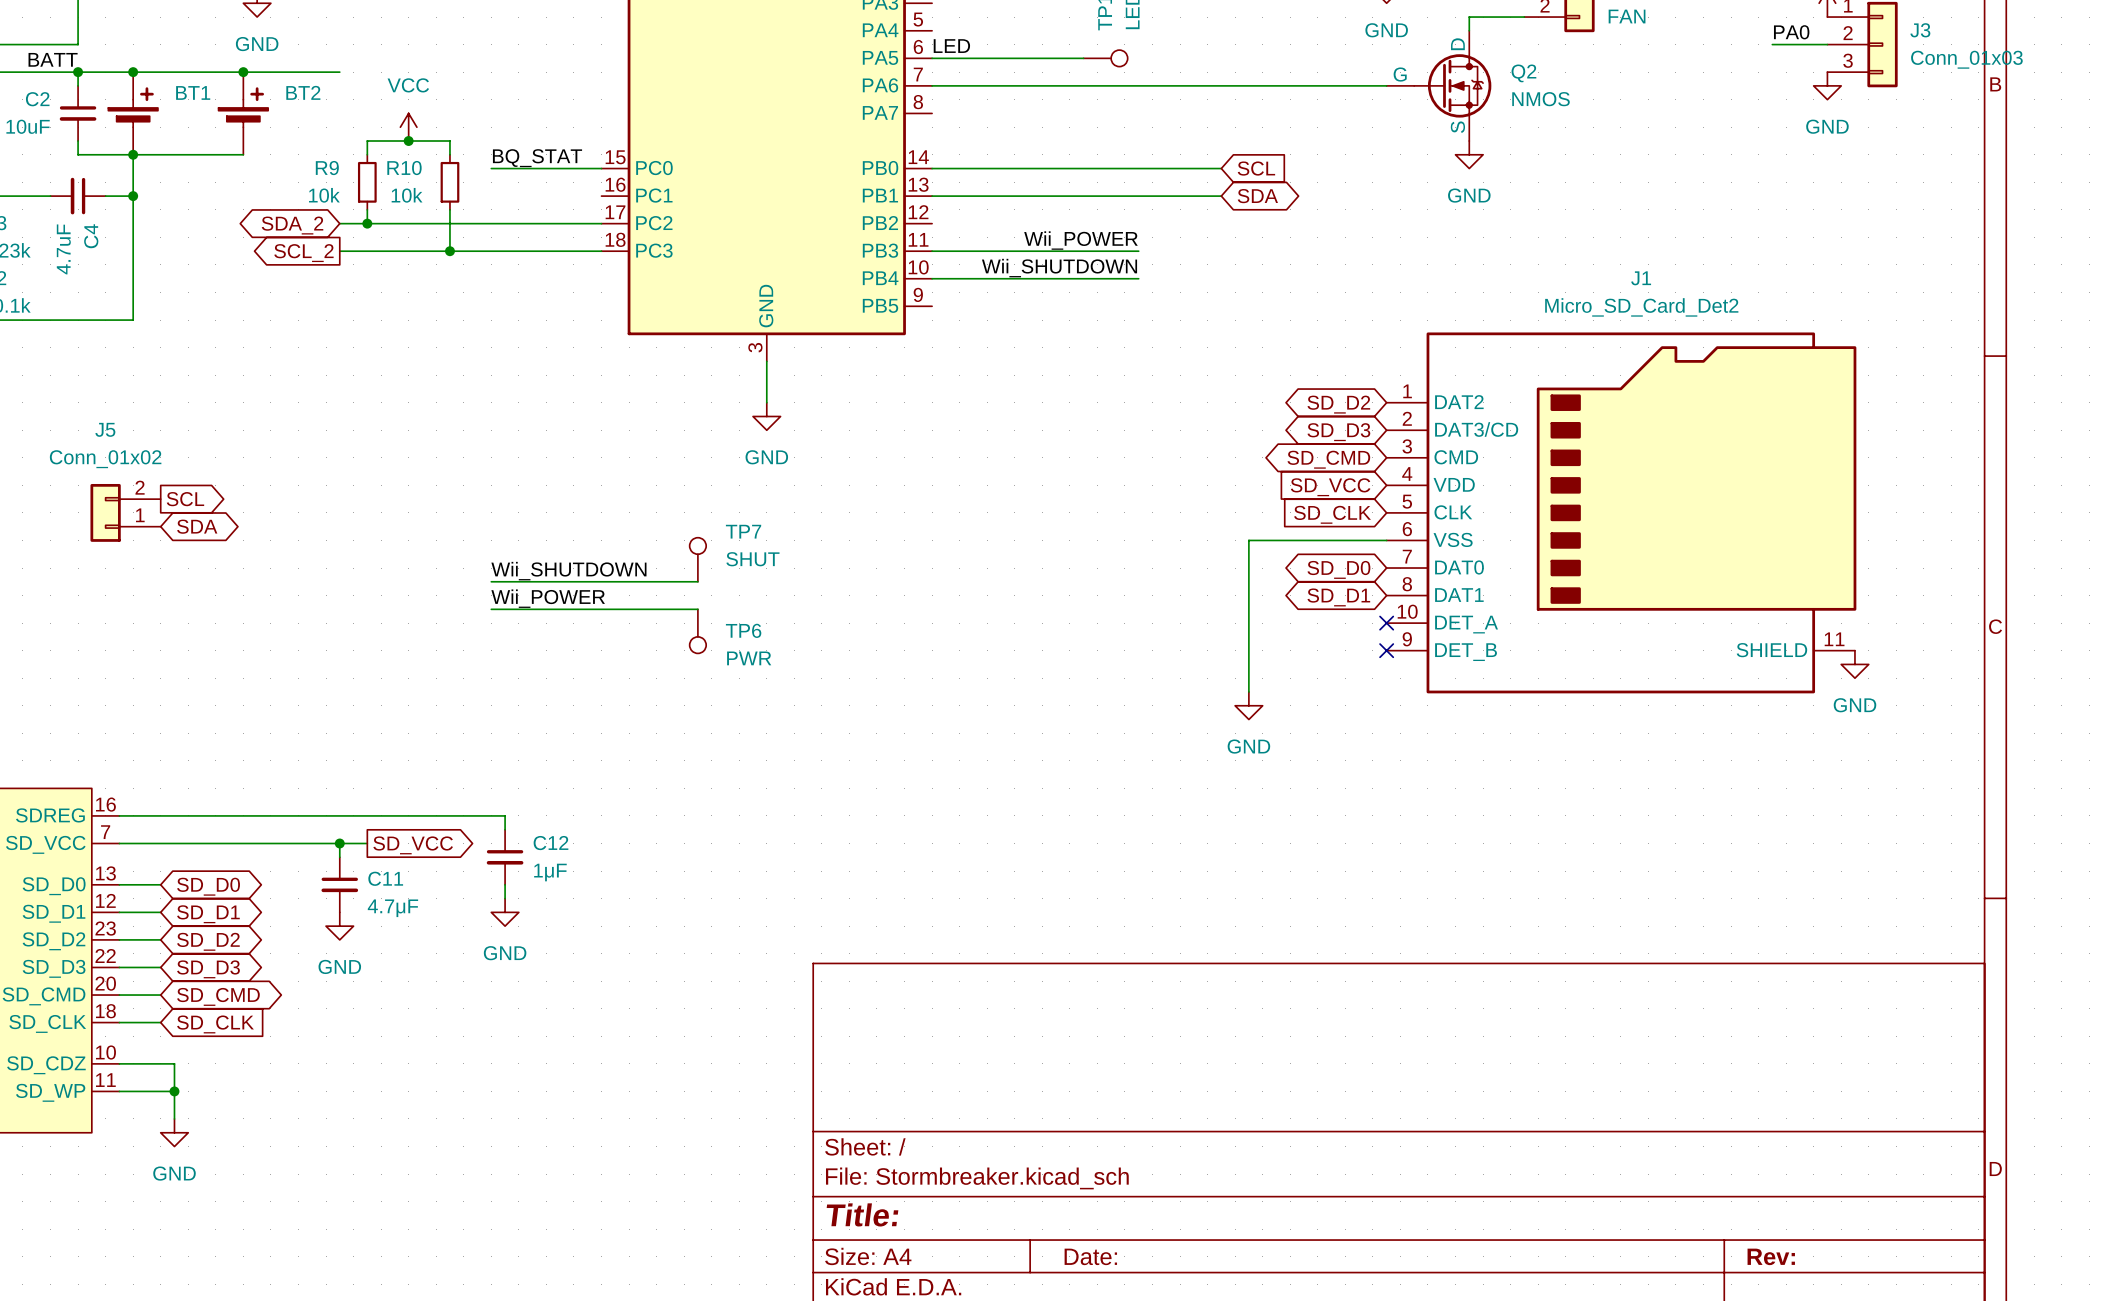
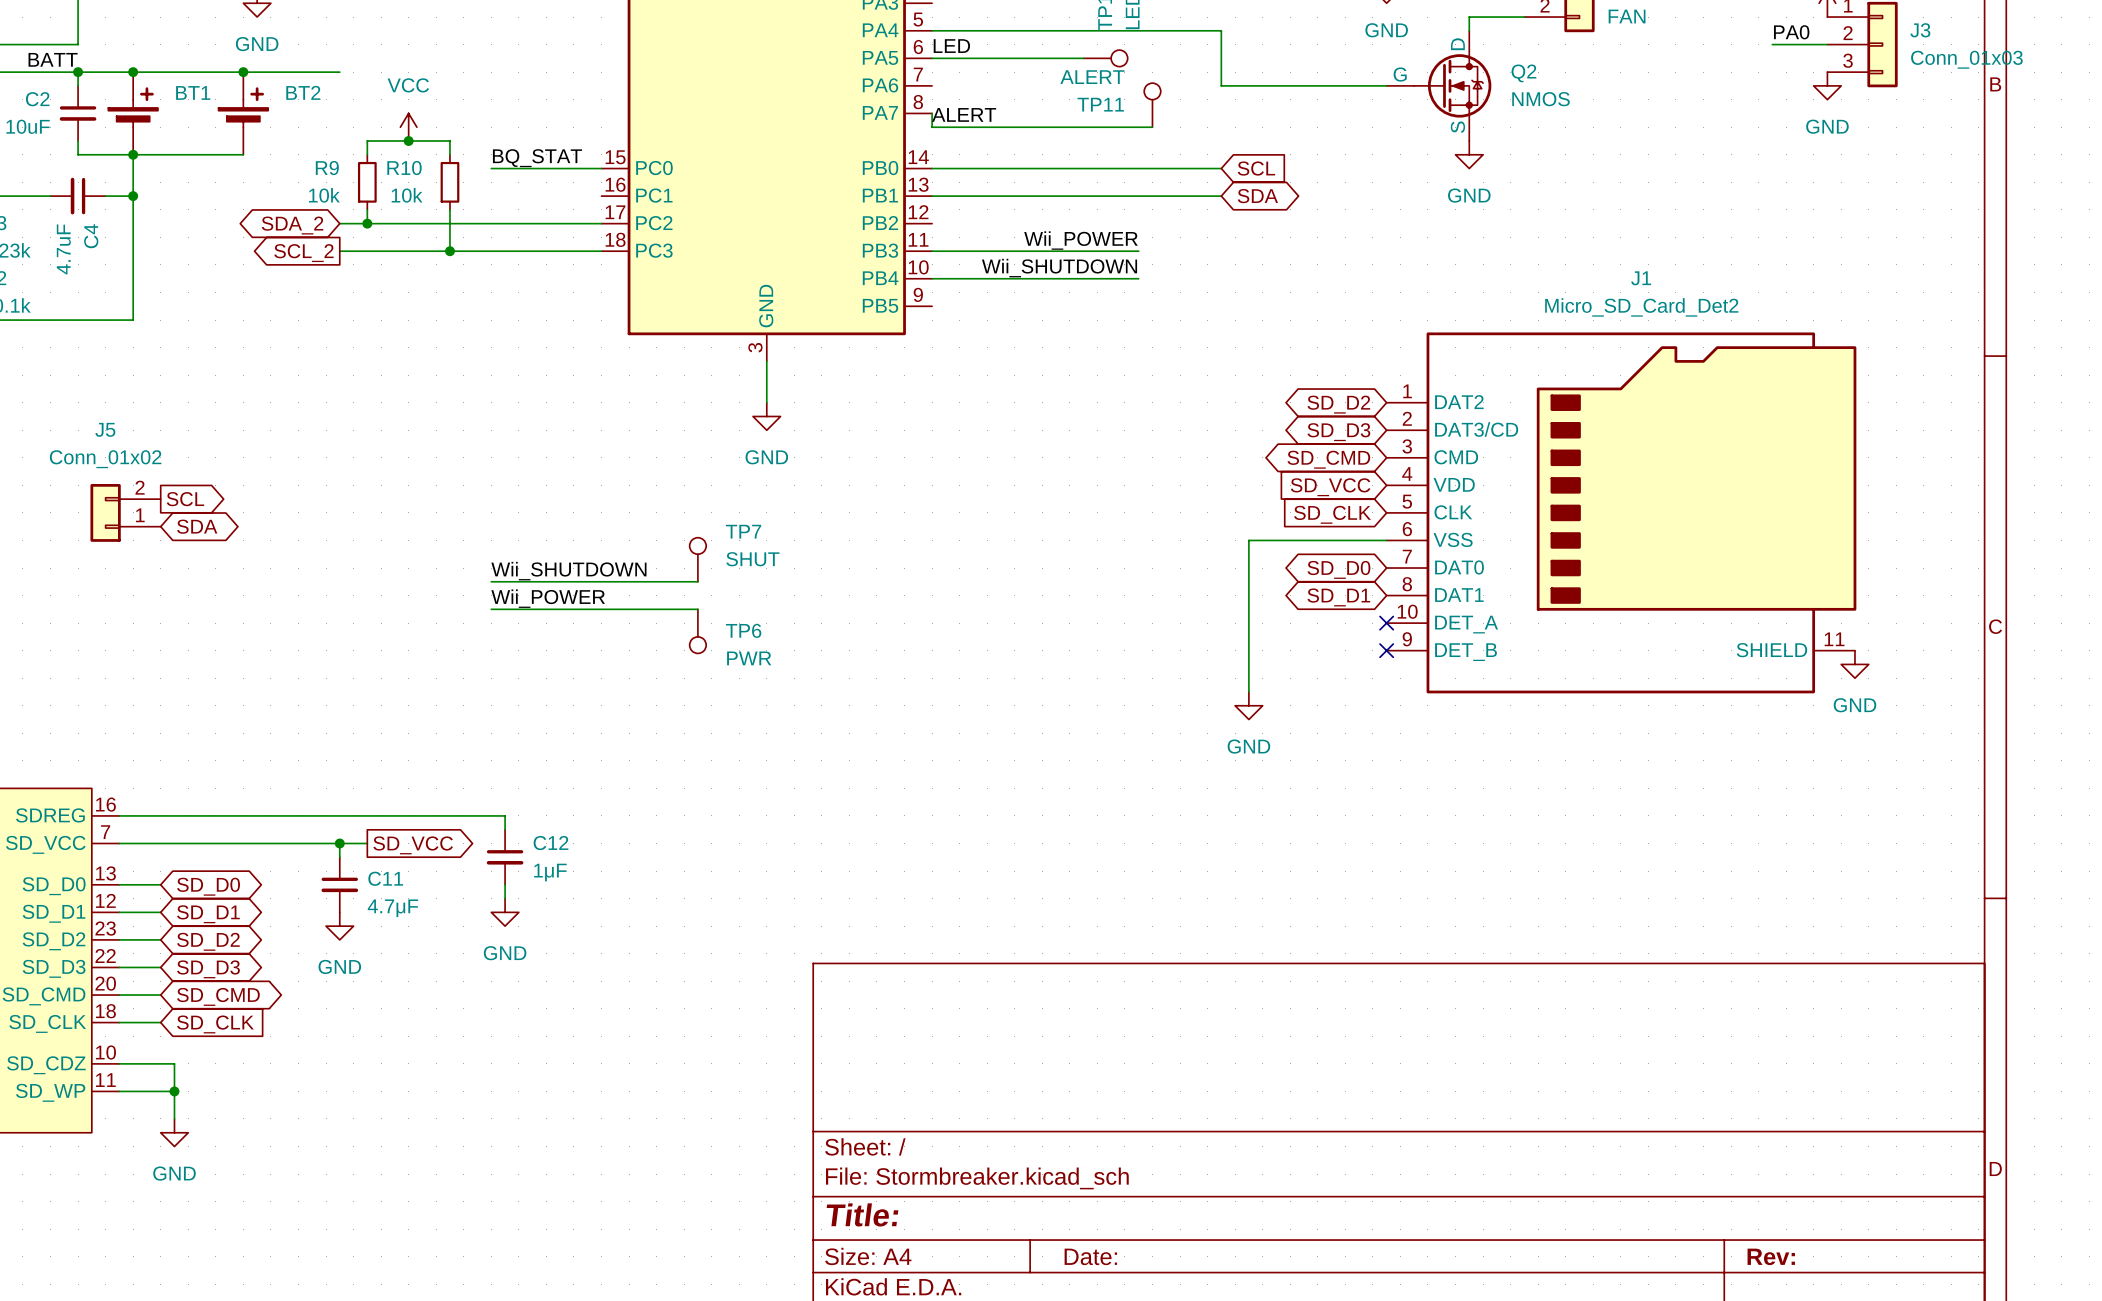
wire: (932, 85) (1221, 85) -> (932, 30) (1221, 30) (1221, 85)
TP11: none -> ALERT (1152, 105)
wire: none -> (932, 113) (932, 127) (1152, 127)
label: none -> ALERT (964, 114)

